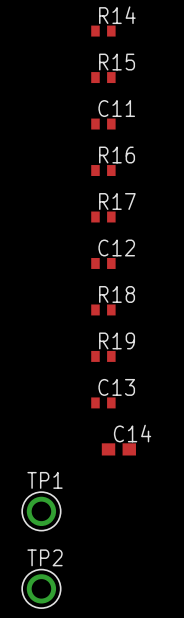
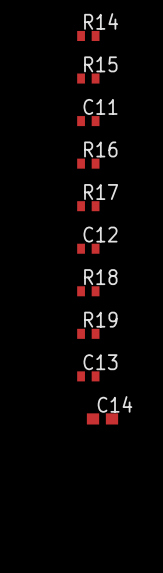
TP1: (41, 511) -> none
TP2: (41, 588) -> none

